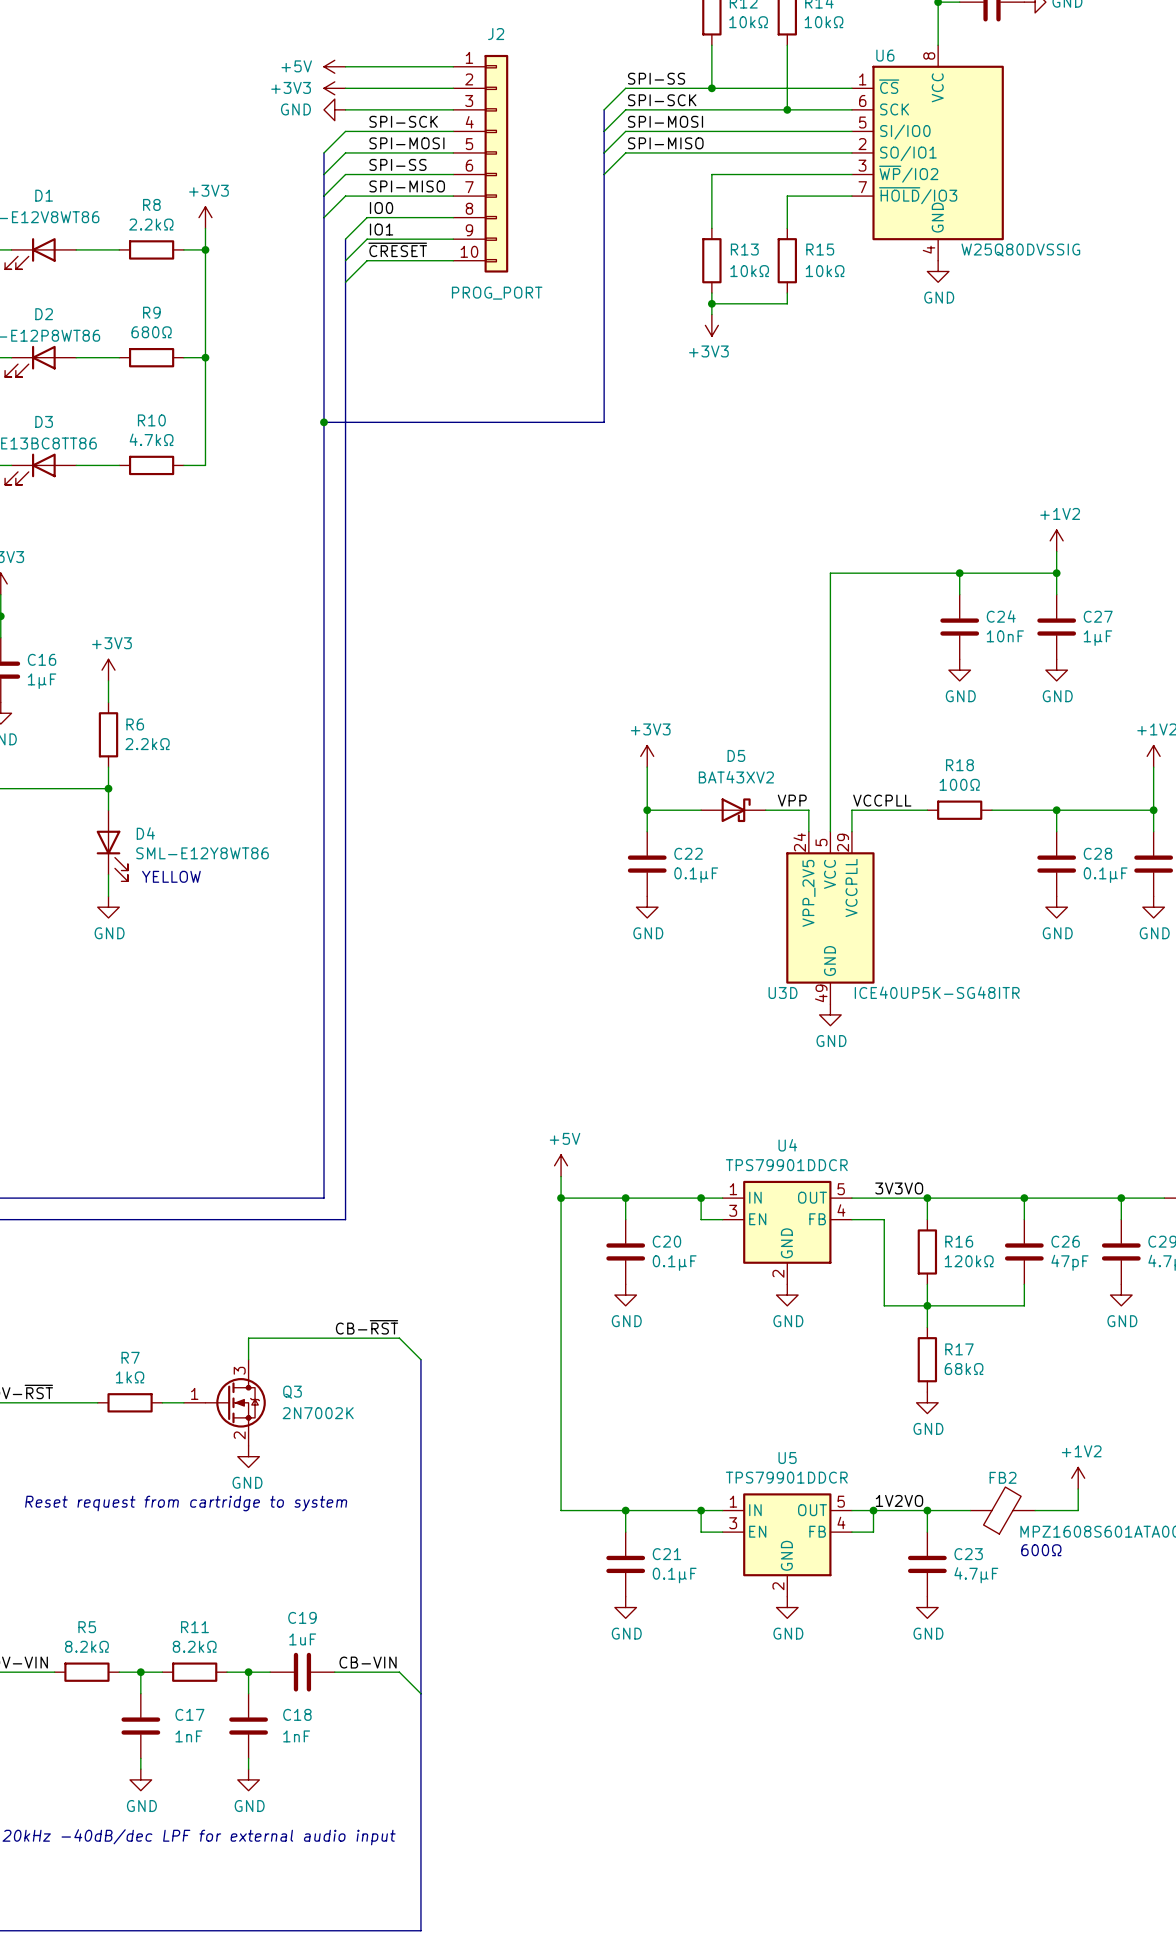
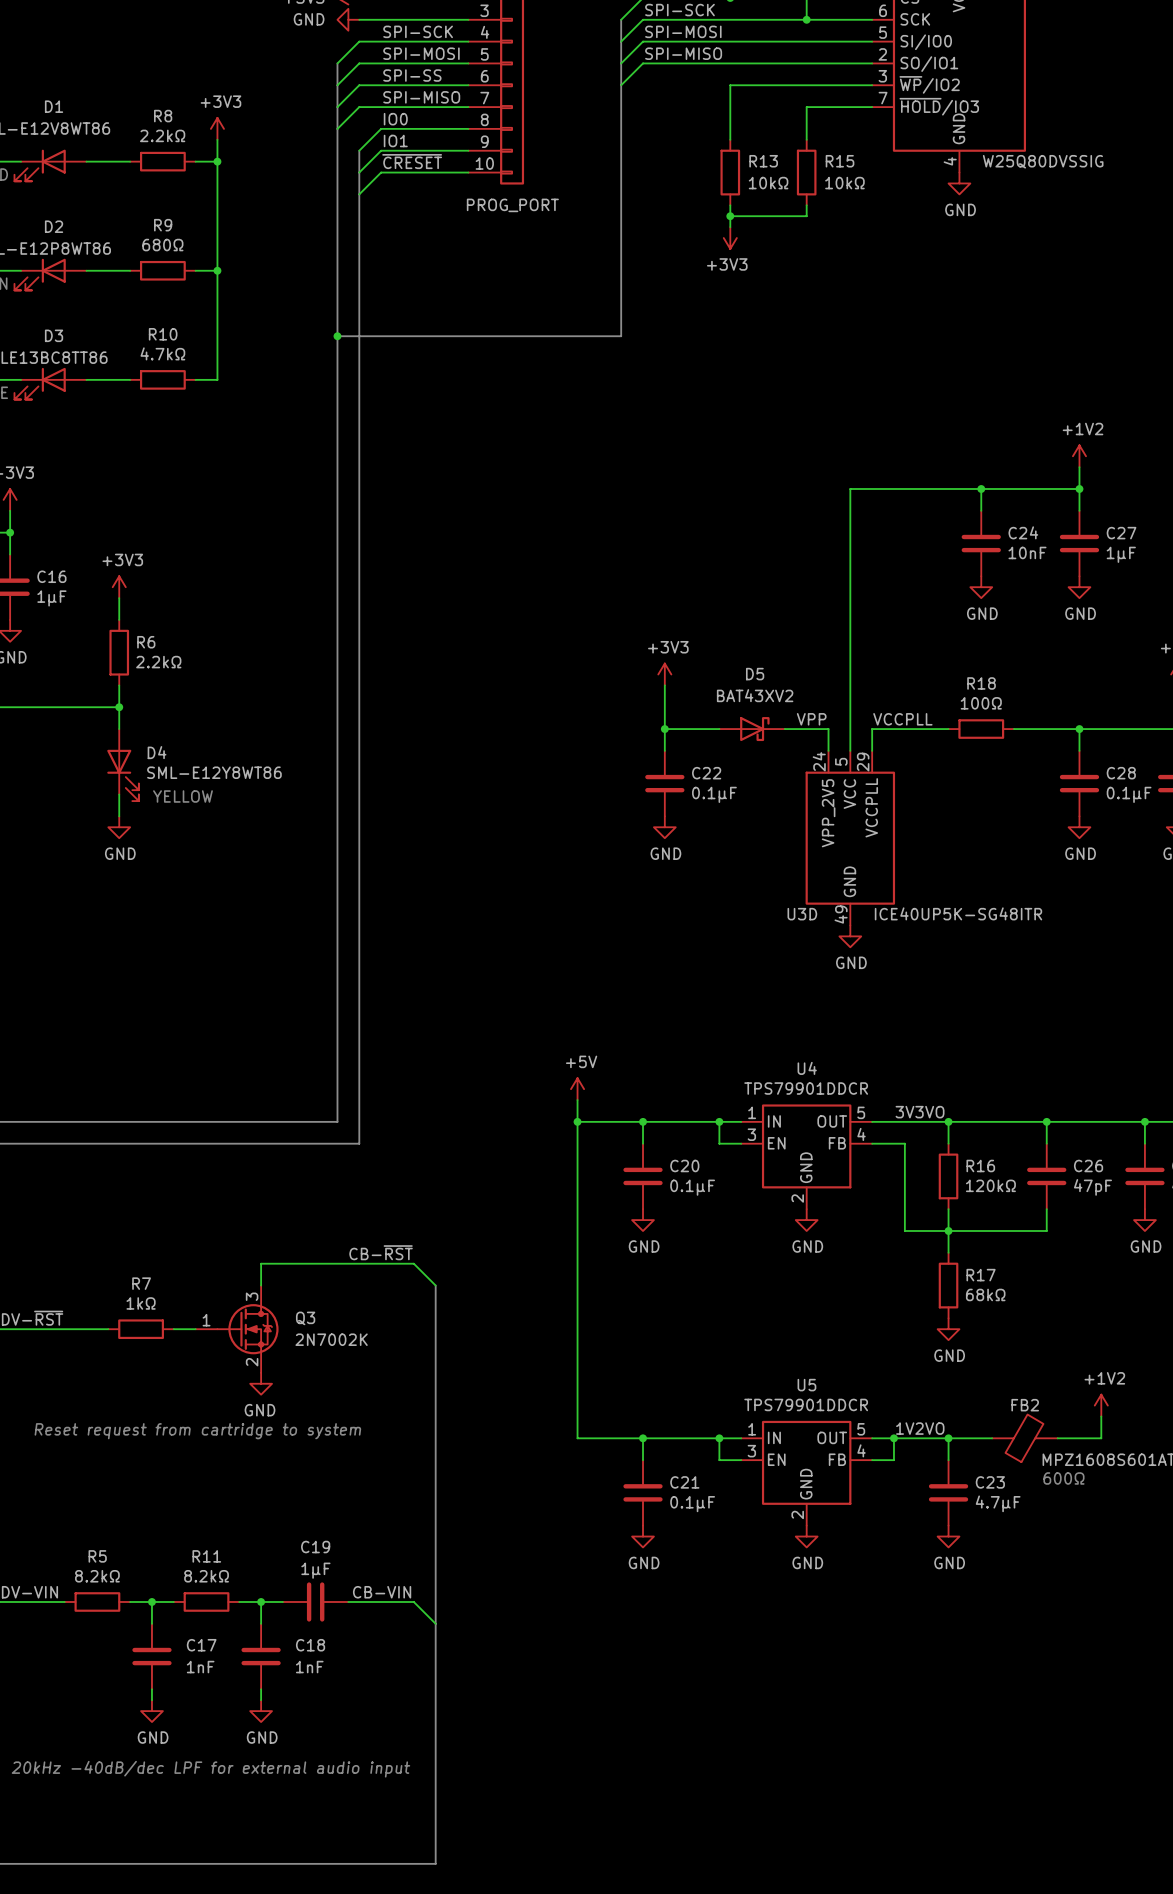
C19 value: 1uF (302, 1639) -> 1μF (315, 1570)

